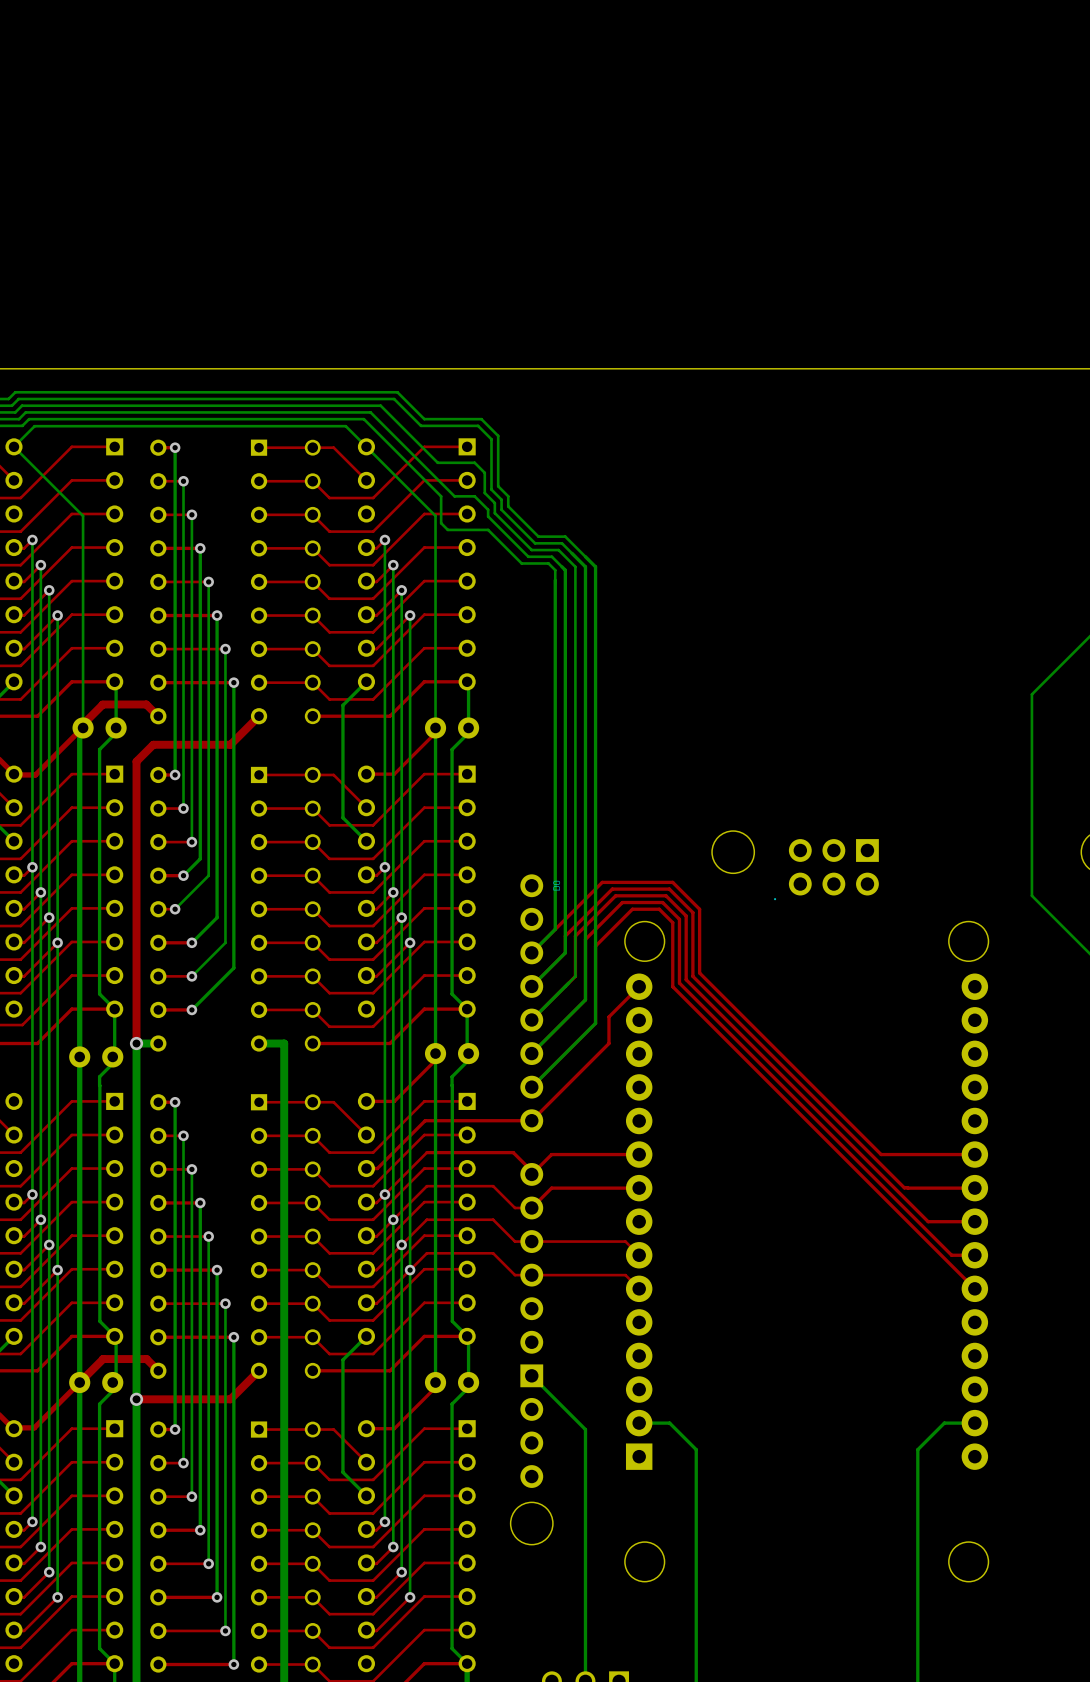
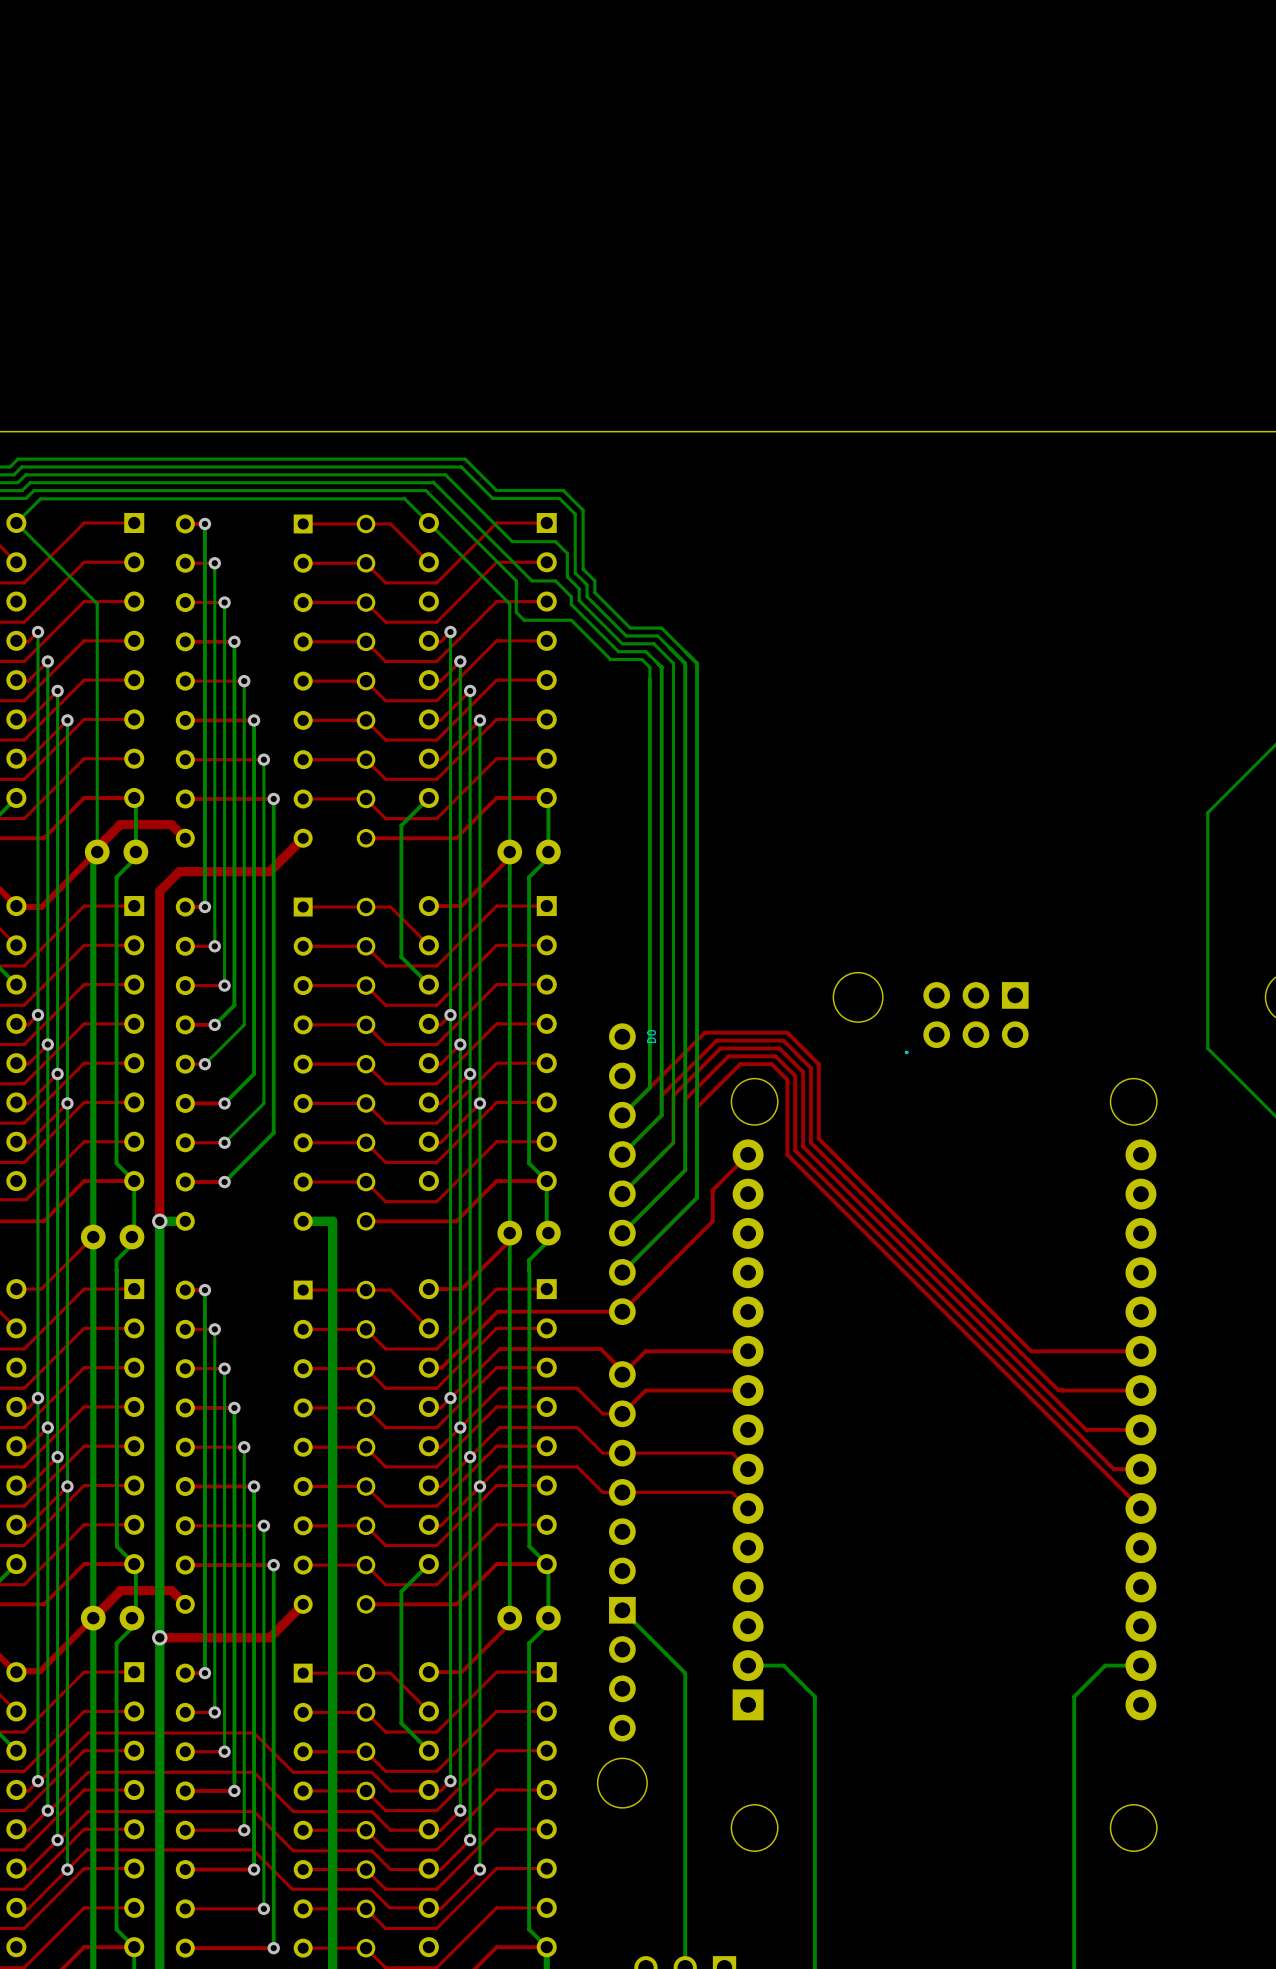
top track: none -> (93, 1237) (41, 1289) (16, 1289)
top track: none -> (37, 1781) (88, 1733) (254, 1733) (293, 1772) (371, 1772) (390, 1790) (429, 1790)
top track: none -> (47, 1810) (88, 1772) (254, 1772) (293, 1811) (371, 1811) (390, 1830) (429, 1830)
top track: none -> (57, 1840) (88, 1811) (254, 1811) (293, 1850) (371, 1850) (390, 1869) (429, 1869)
top track: none -> (67, 1869) (87, 1849) (253, 1849) (292, 1889) (370, 1889) (389, 1907) (428, 1907)

